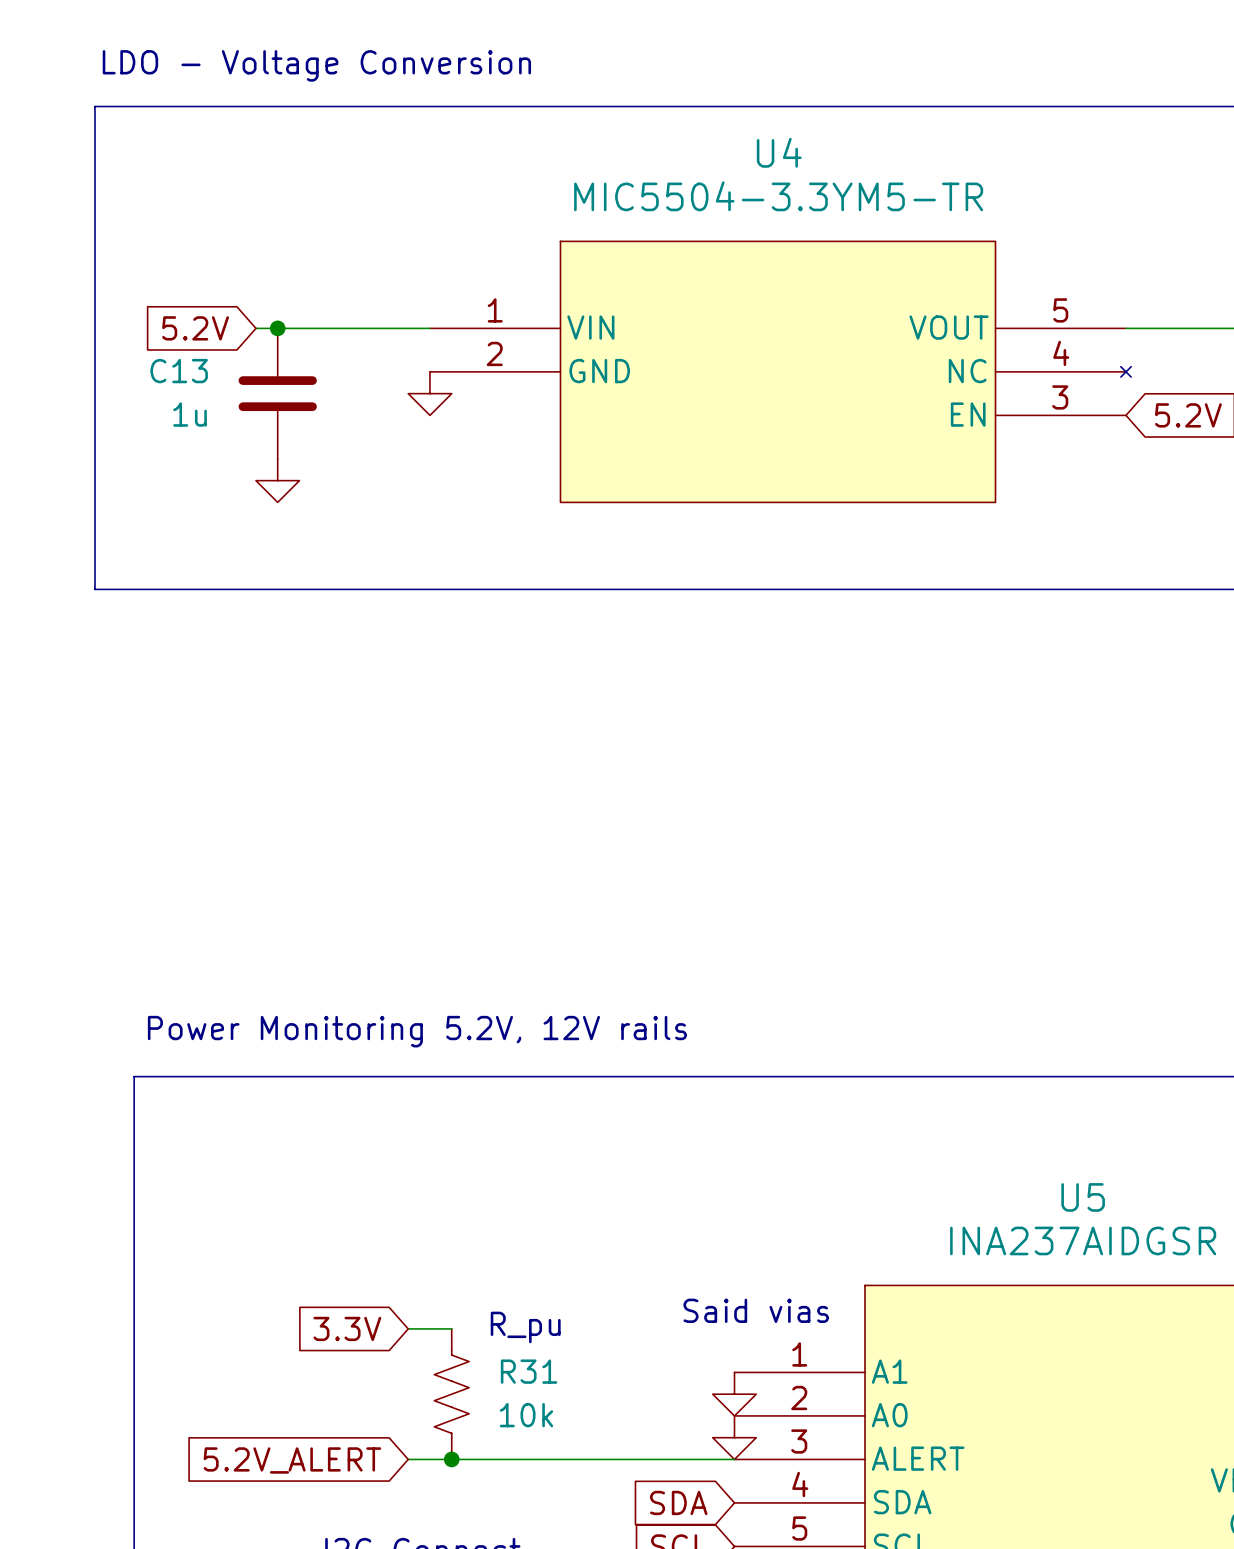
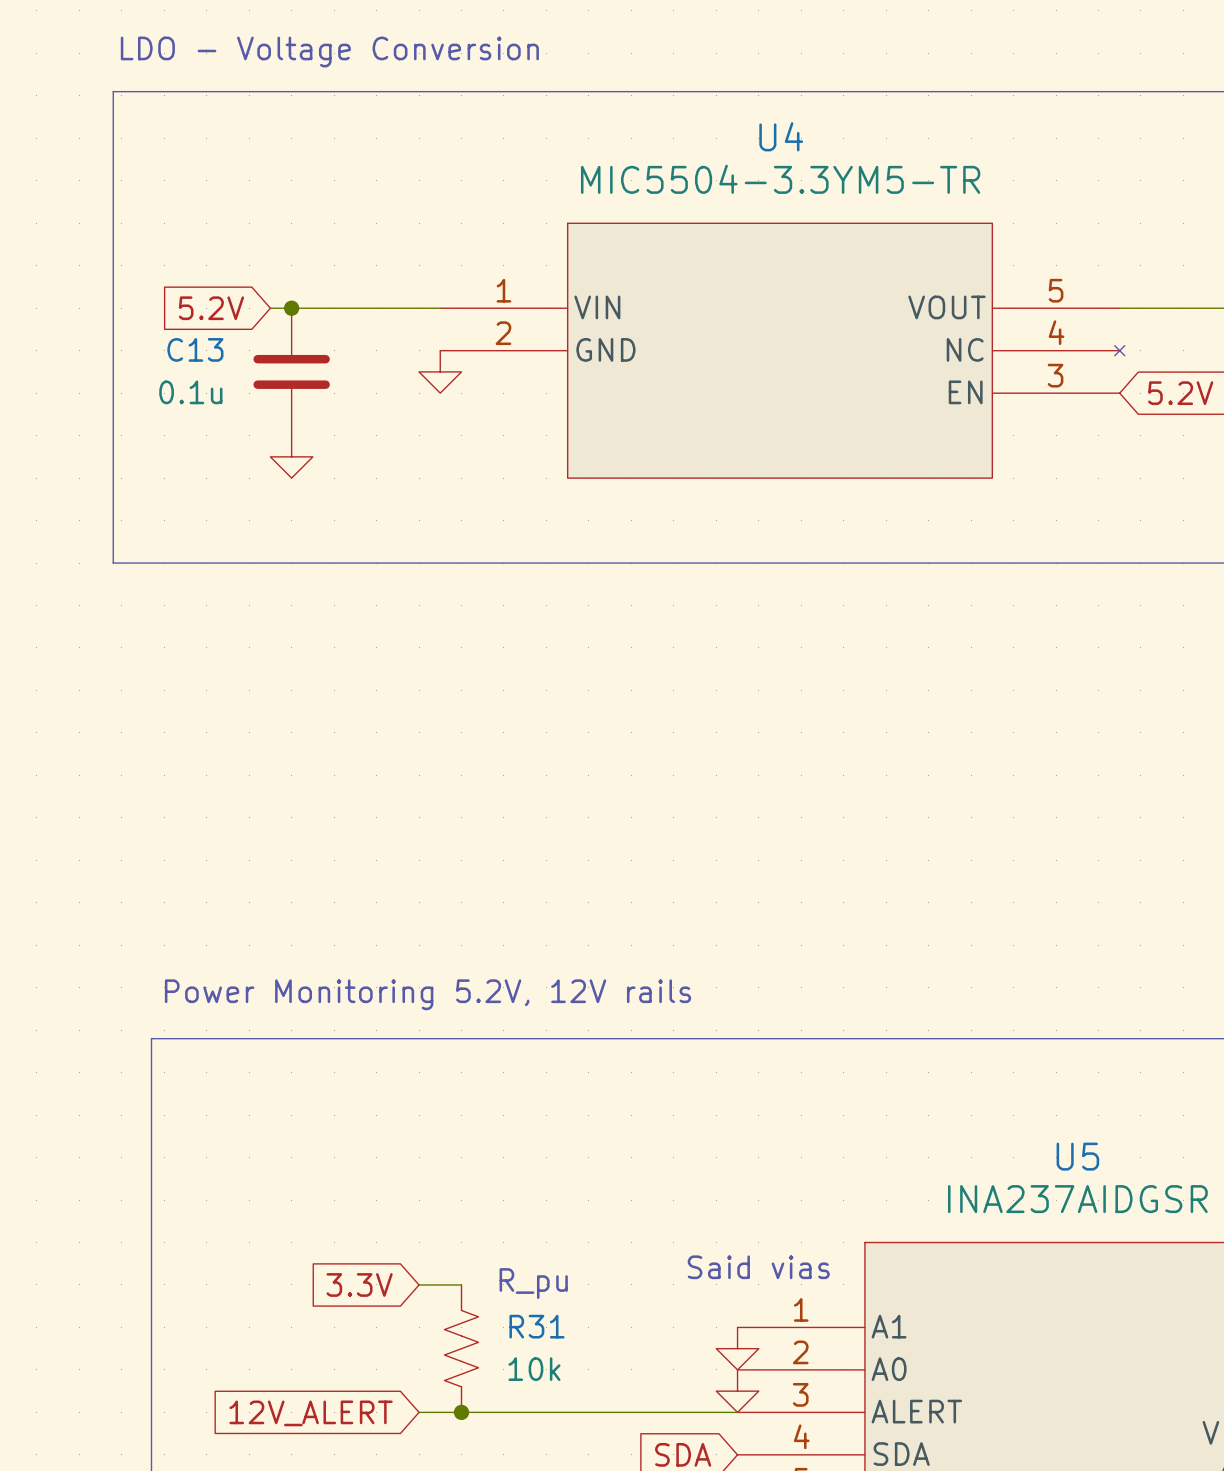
C13 value: 1u (190, 414) -> 0.1u (190, 392)
global label: 5.2V_ALERT (292, 1460) -> 12V_ALERT (311, 1413)

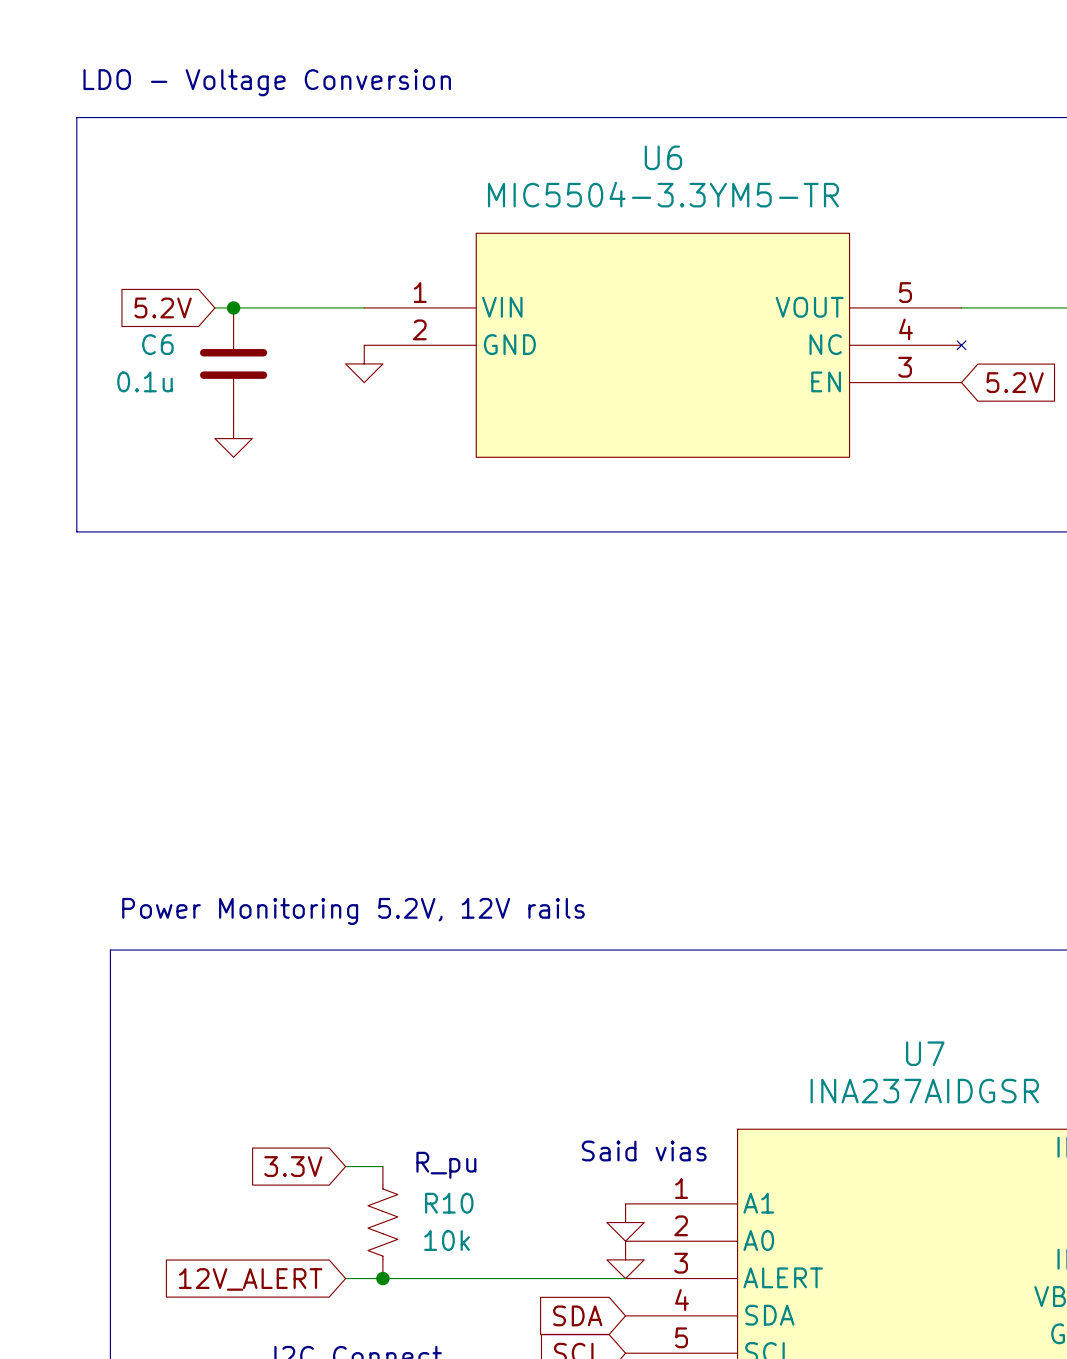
U4 name: U4 (781, 136) -> U6 (663, 157)
C13 name: C13 (195, 349) -> C6 (157, 344)
U5 name: U5 (1077, 1156) -> U7 (925, 1053)
R31 name: R31 (536, 1326) -> R10 (449, 1203)

